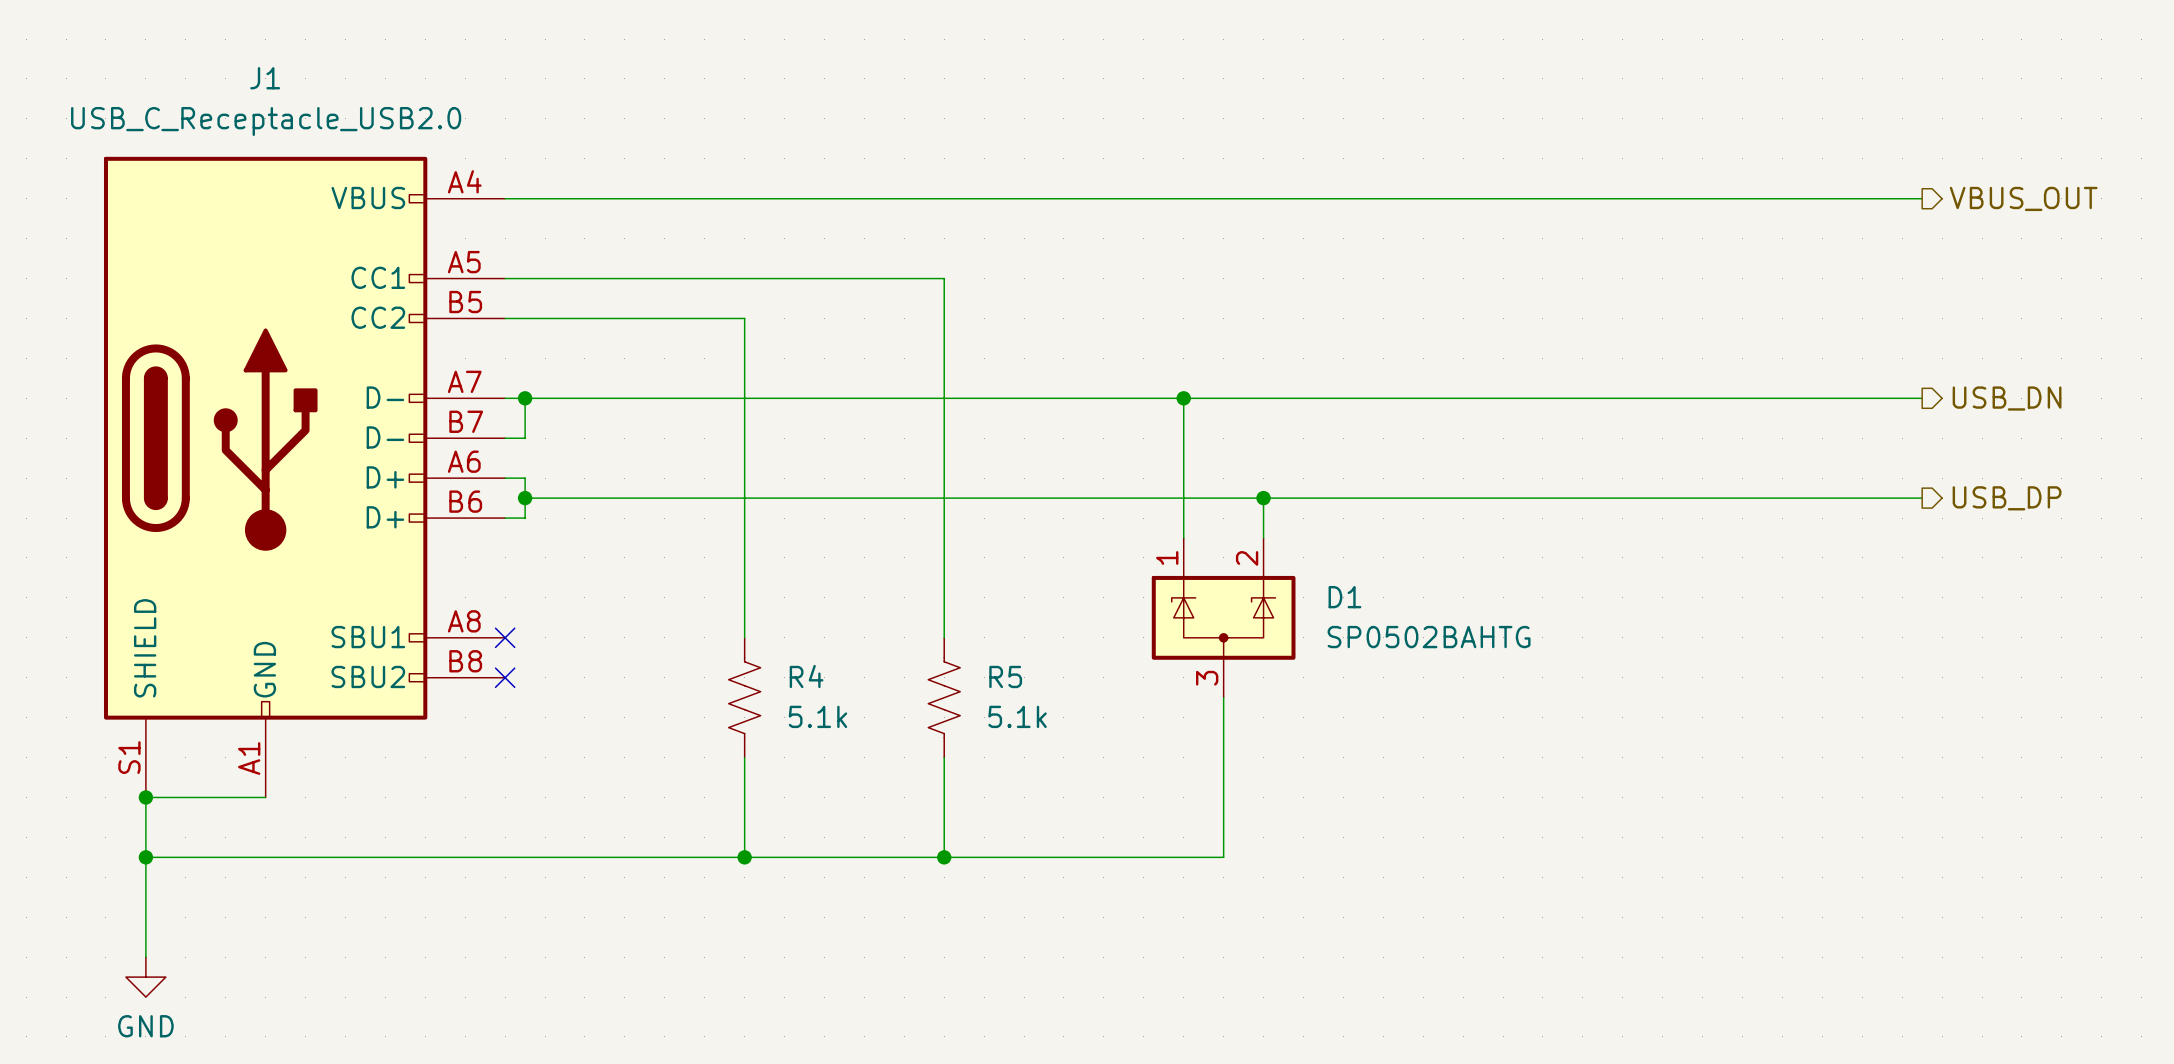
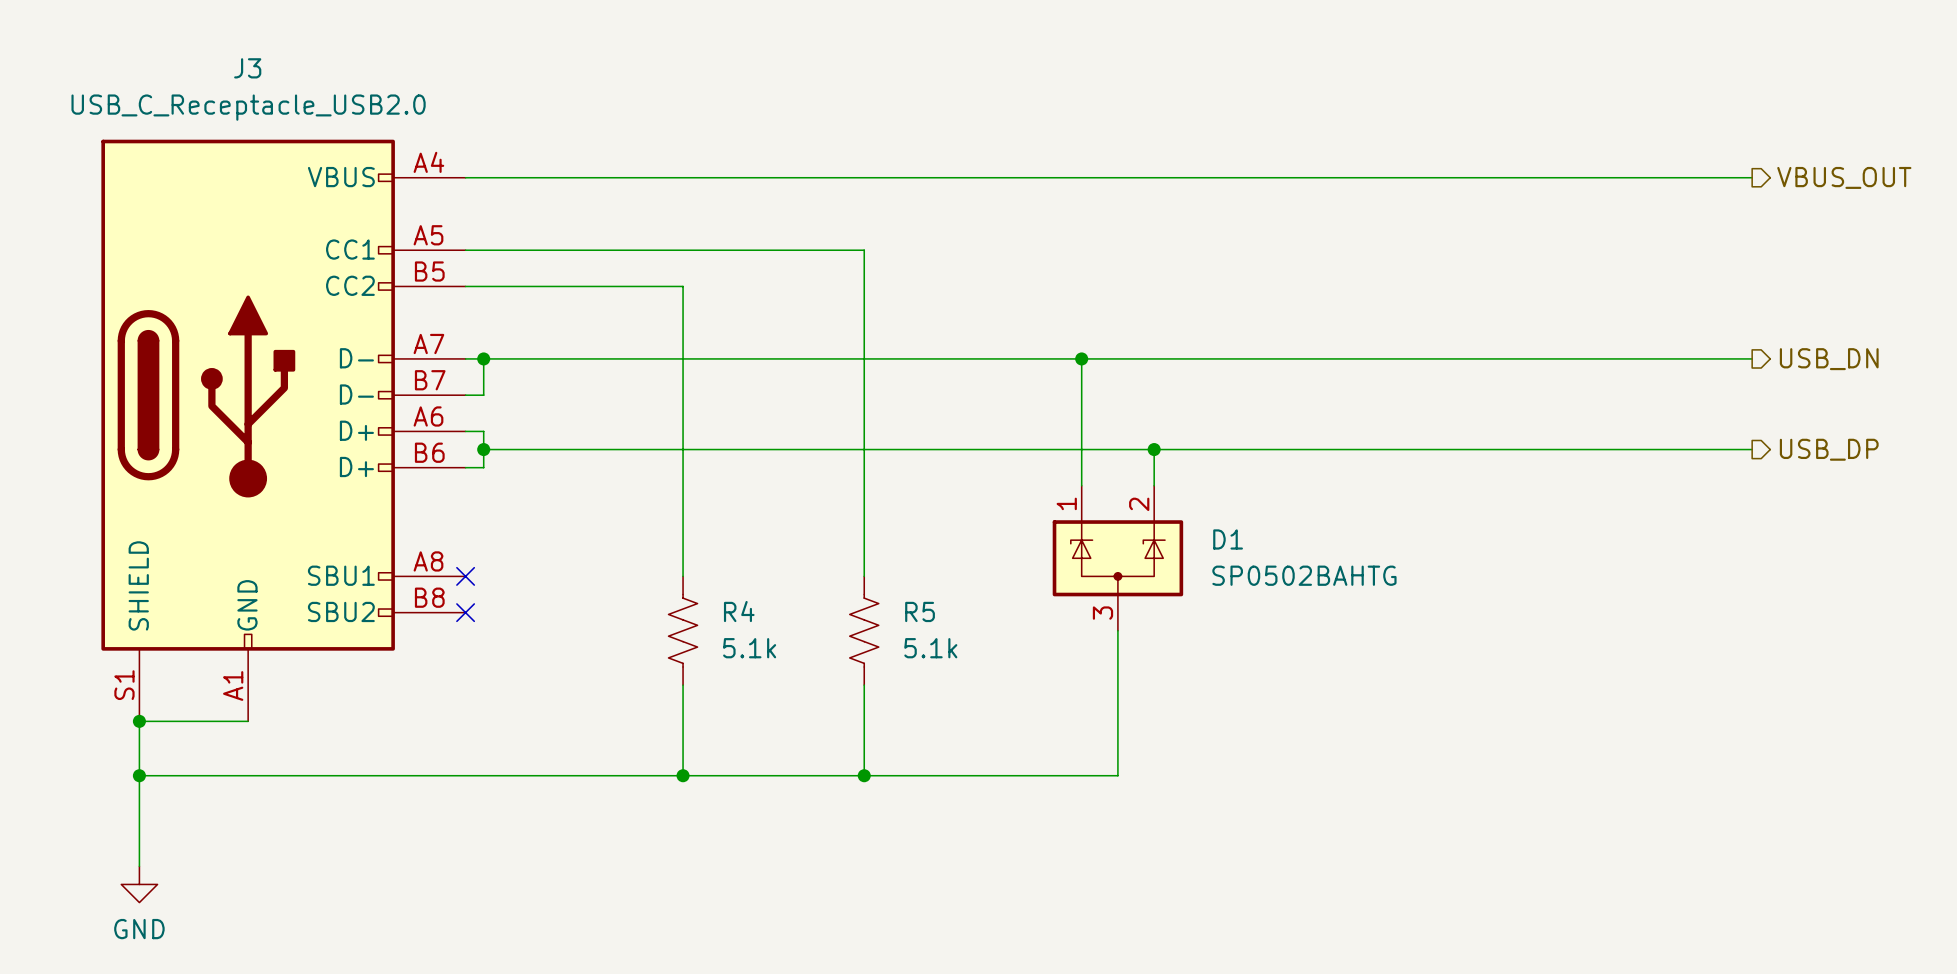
J1 name: J1 (265, 78) -> J3 (247, 68)

